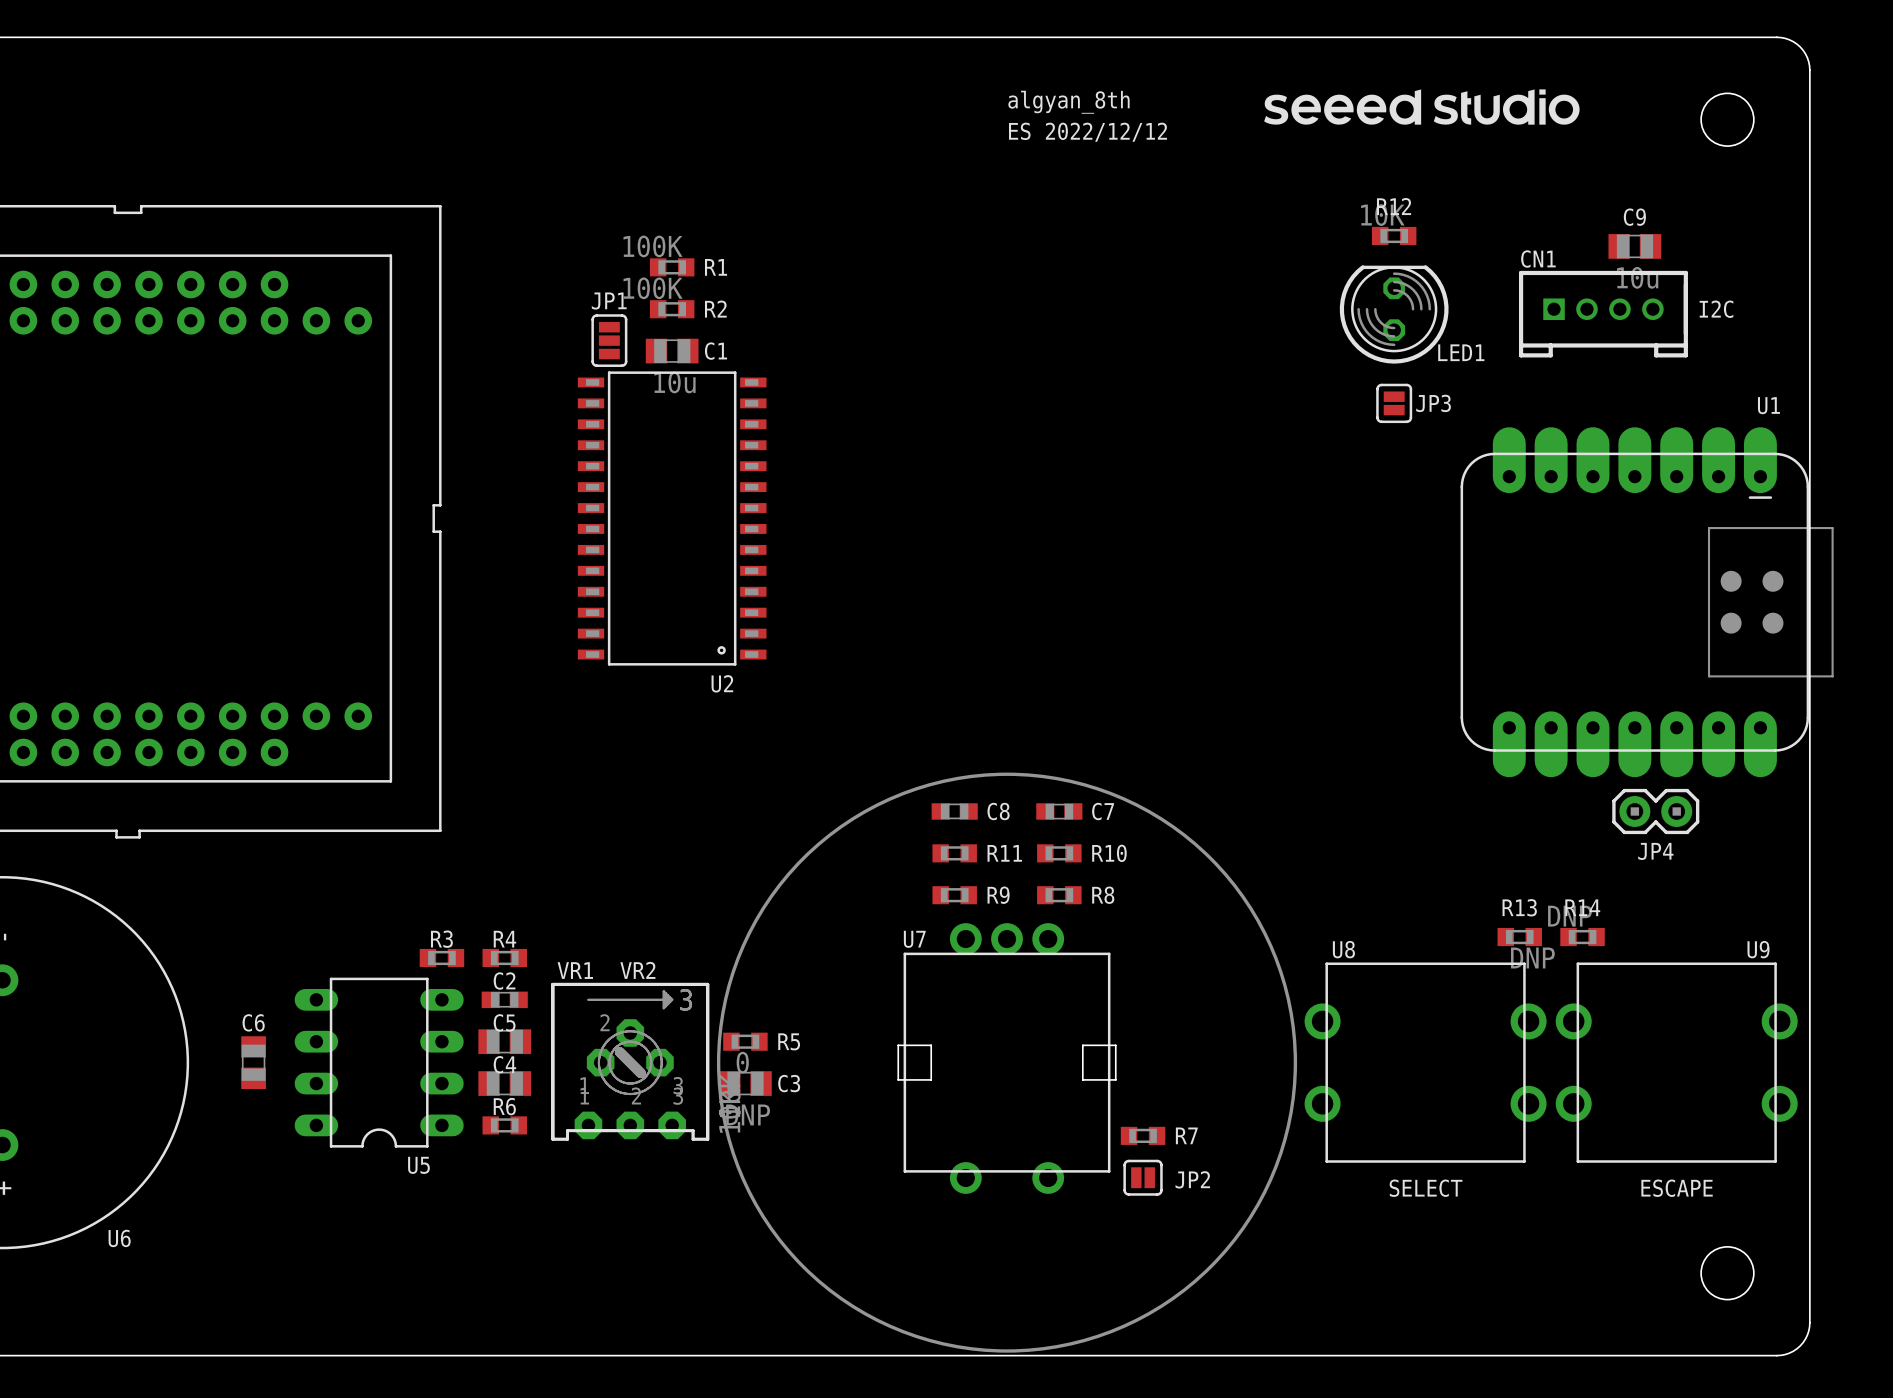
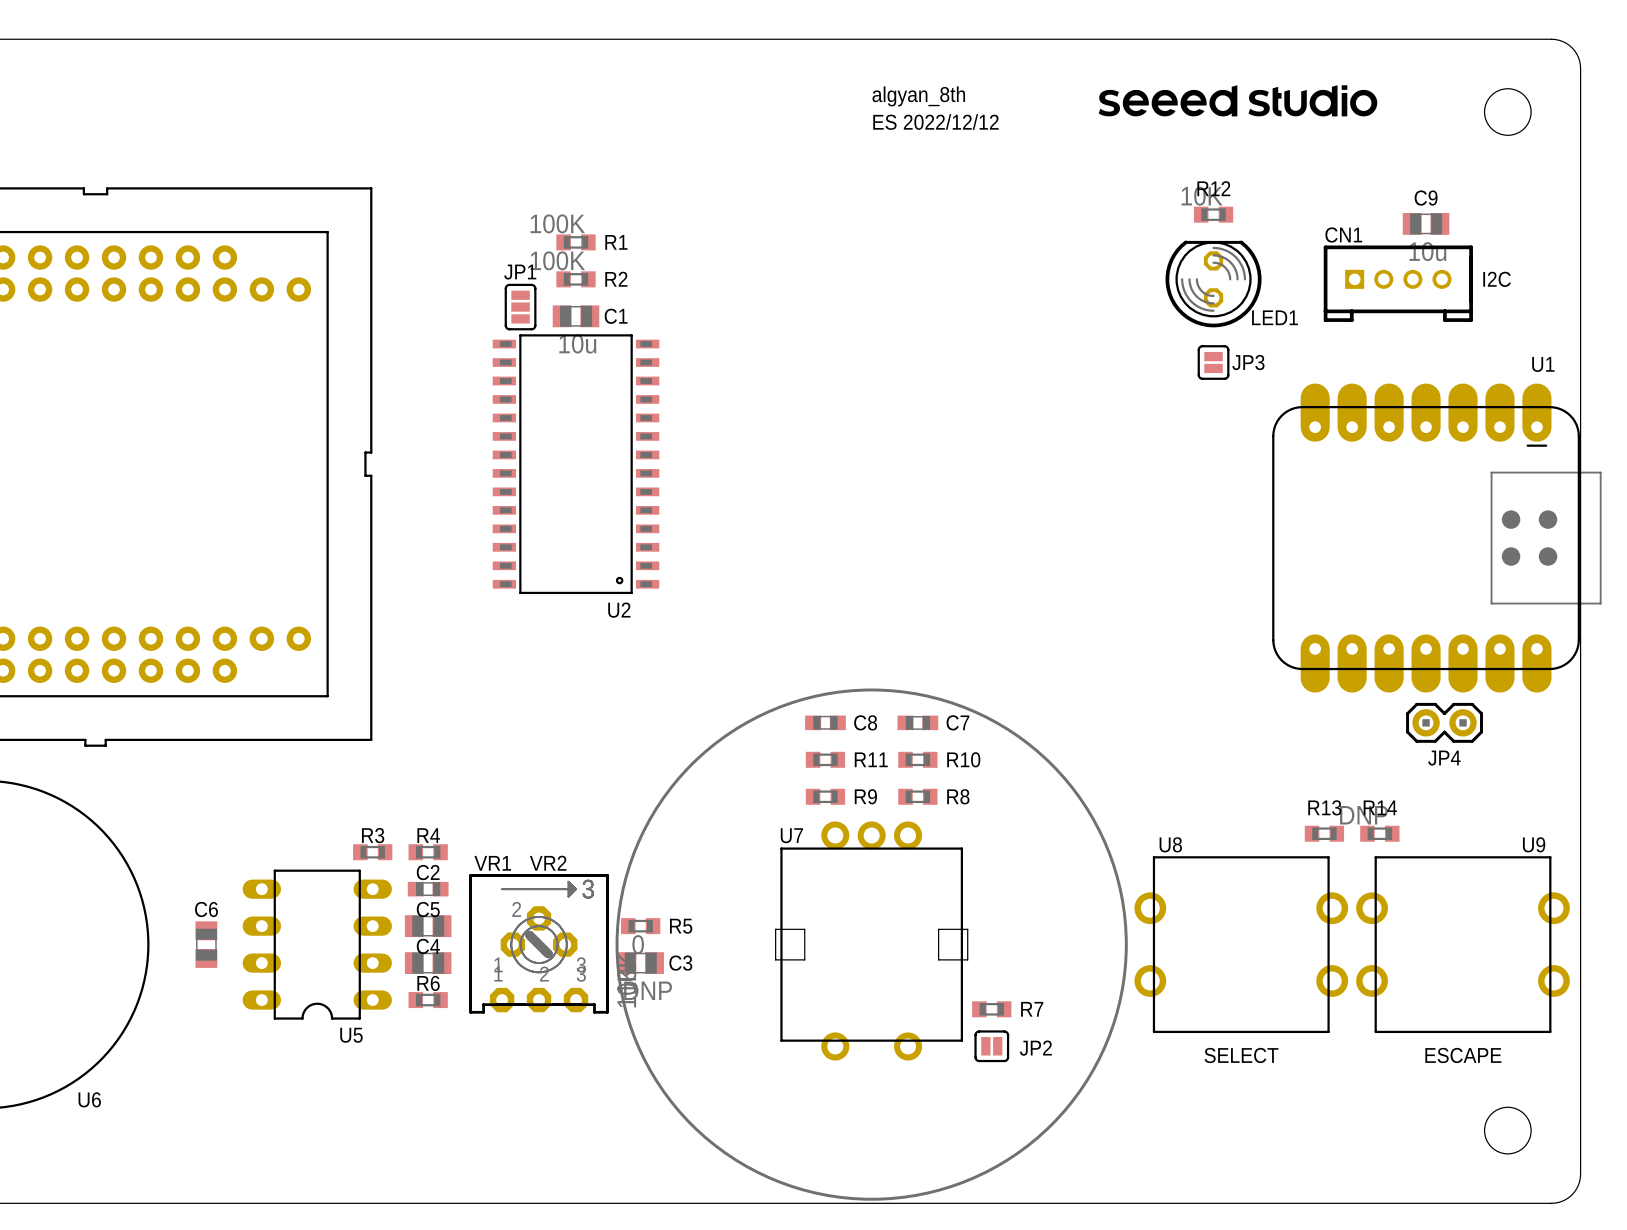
R13 value: DNP (1532, 957) -> none

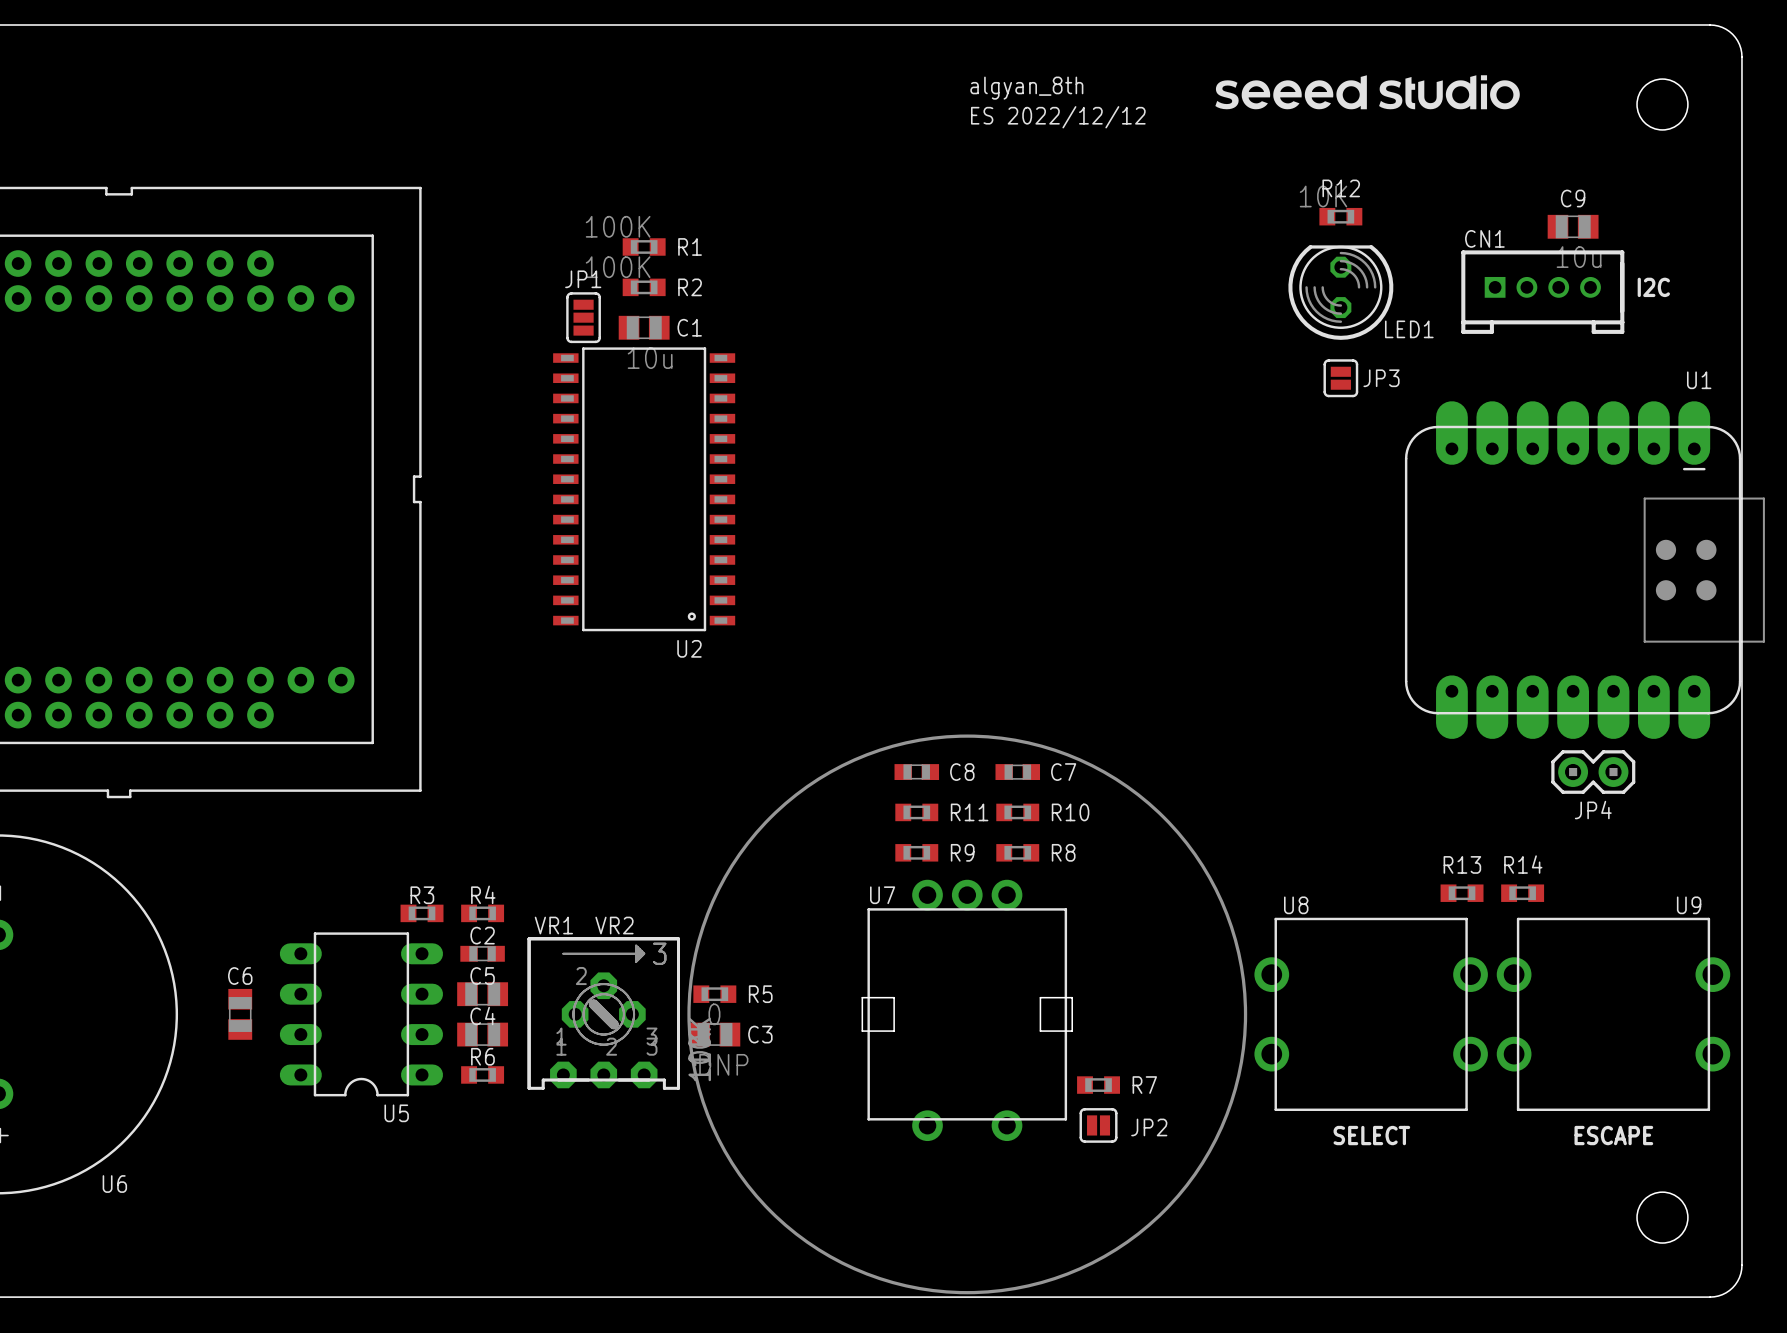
R14 value: DNP (1363, 815) -> none

